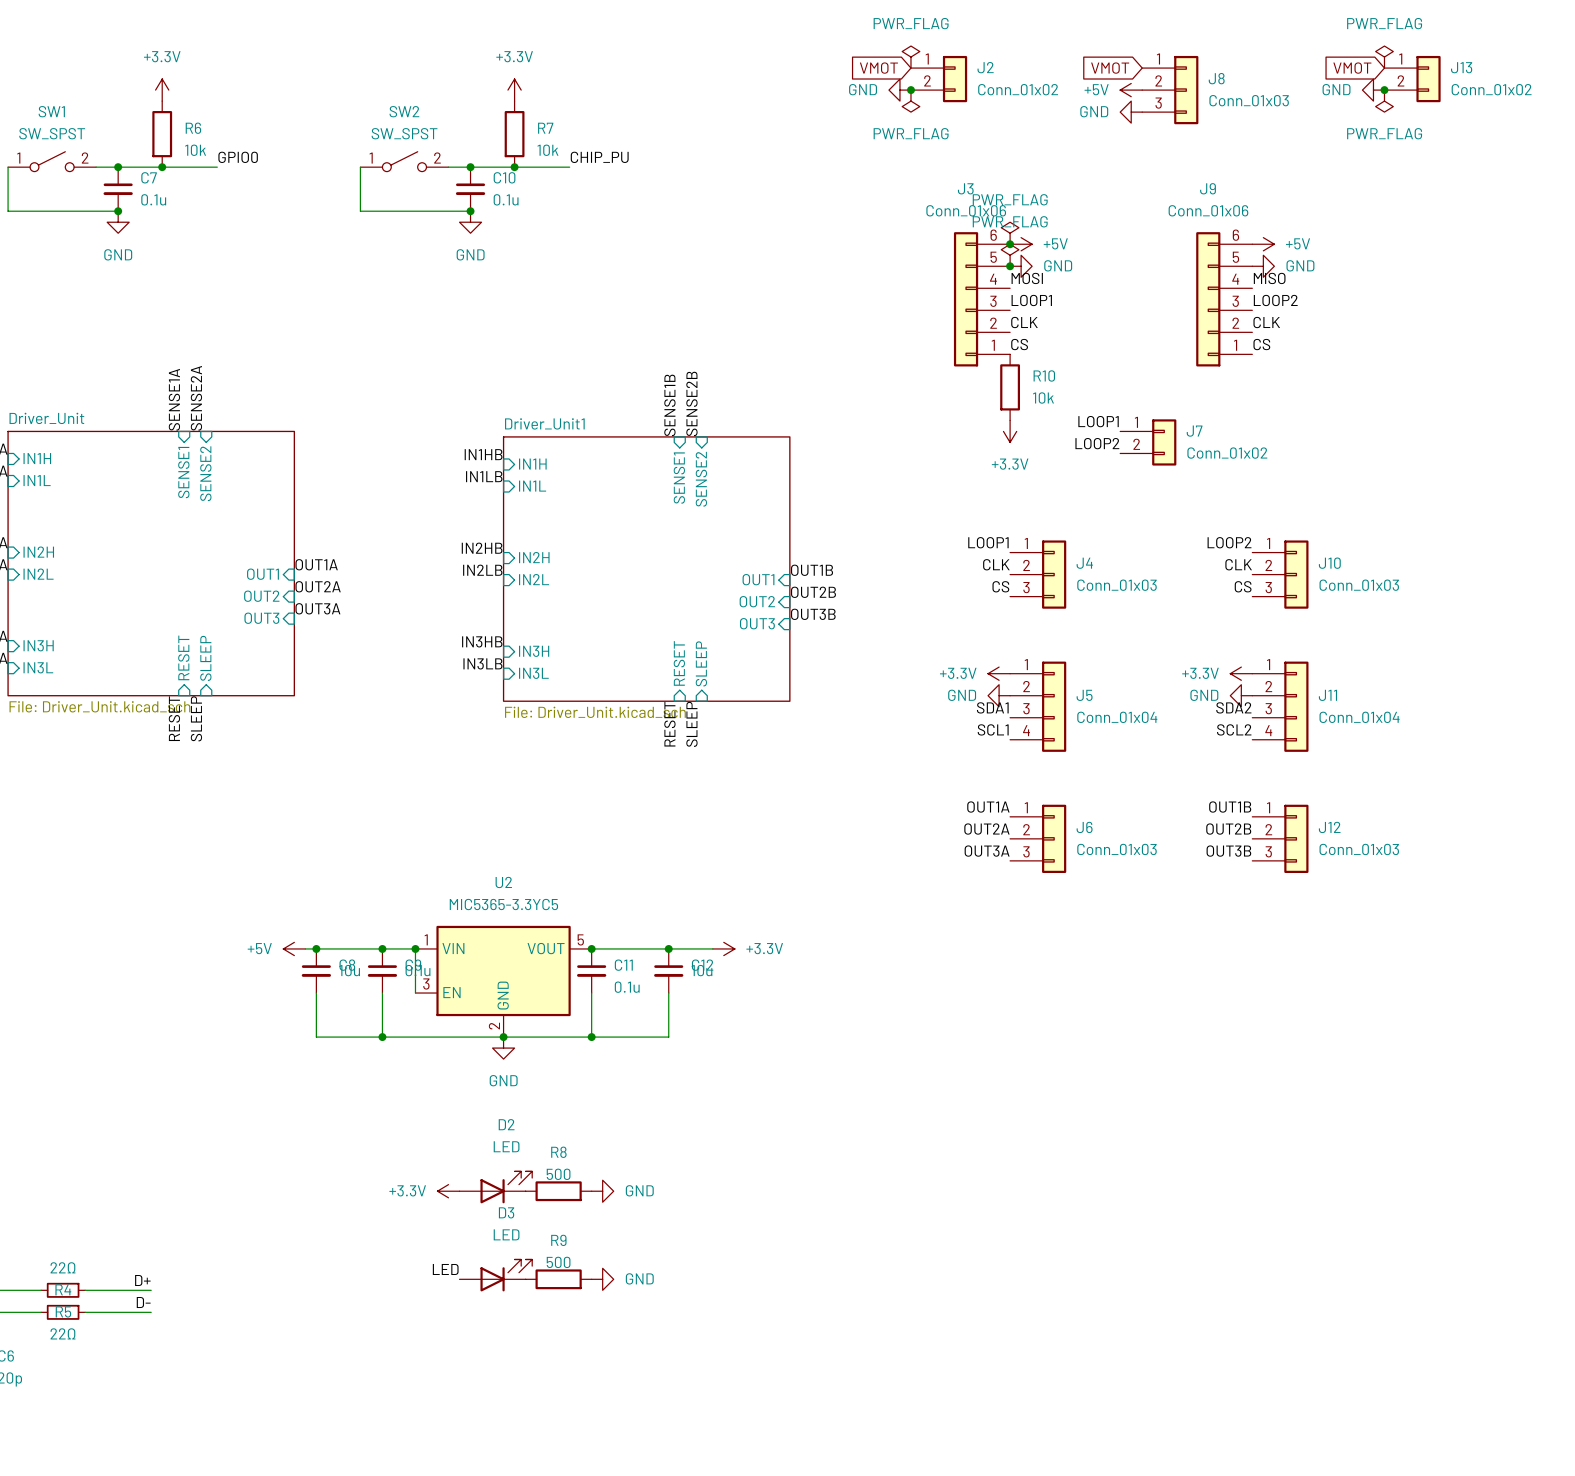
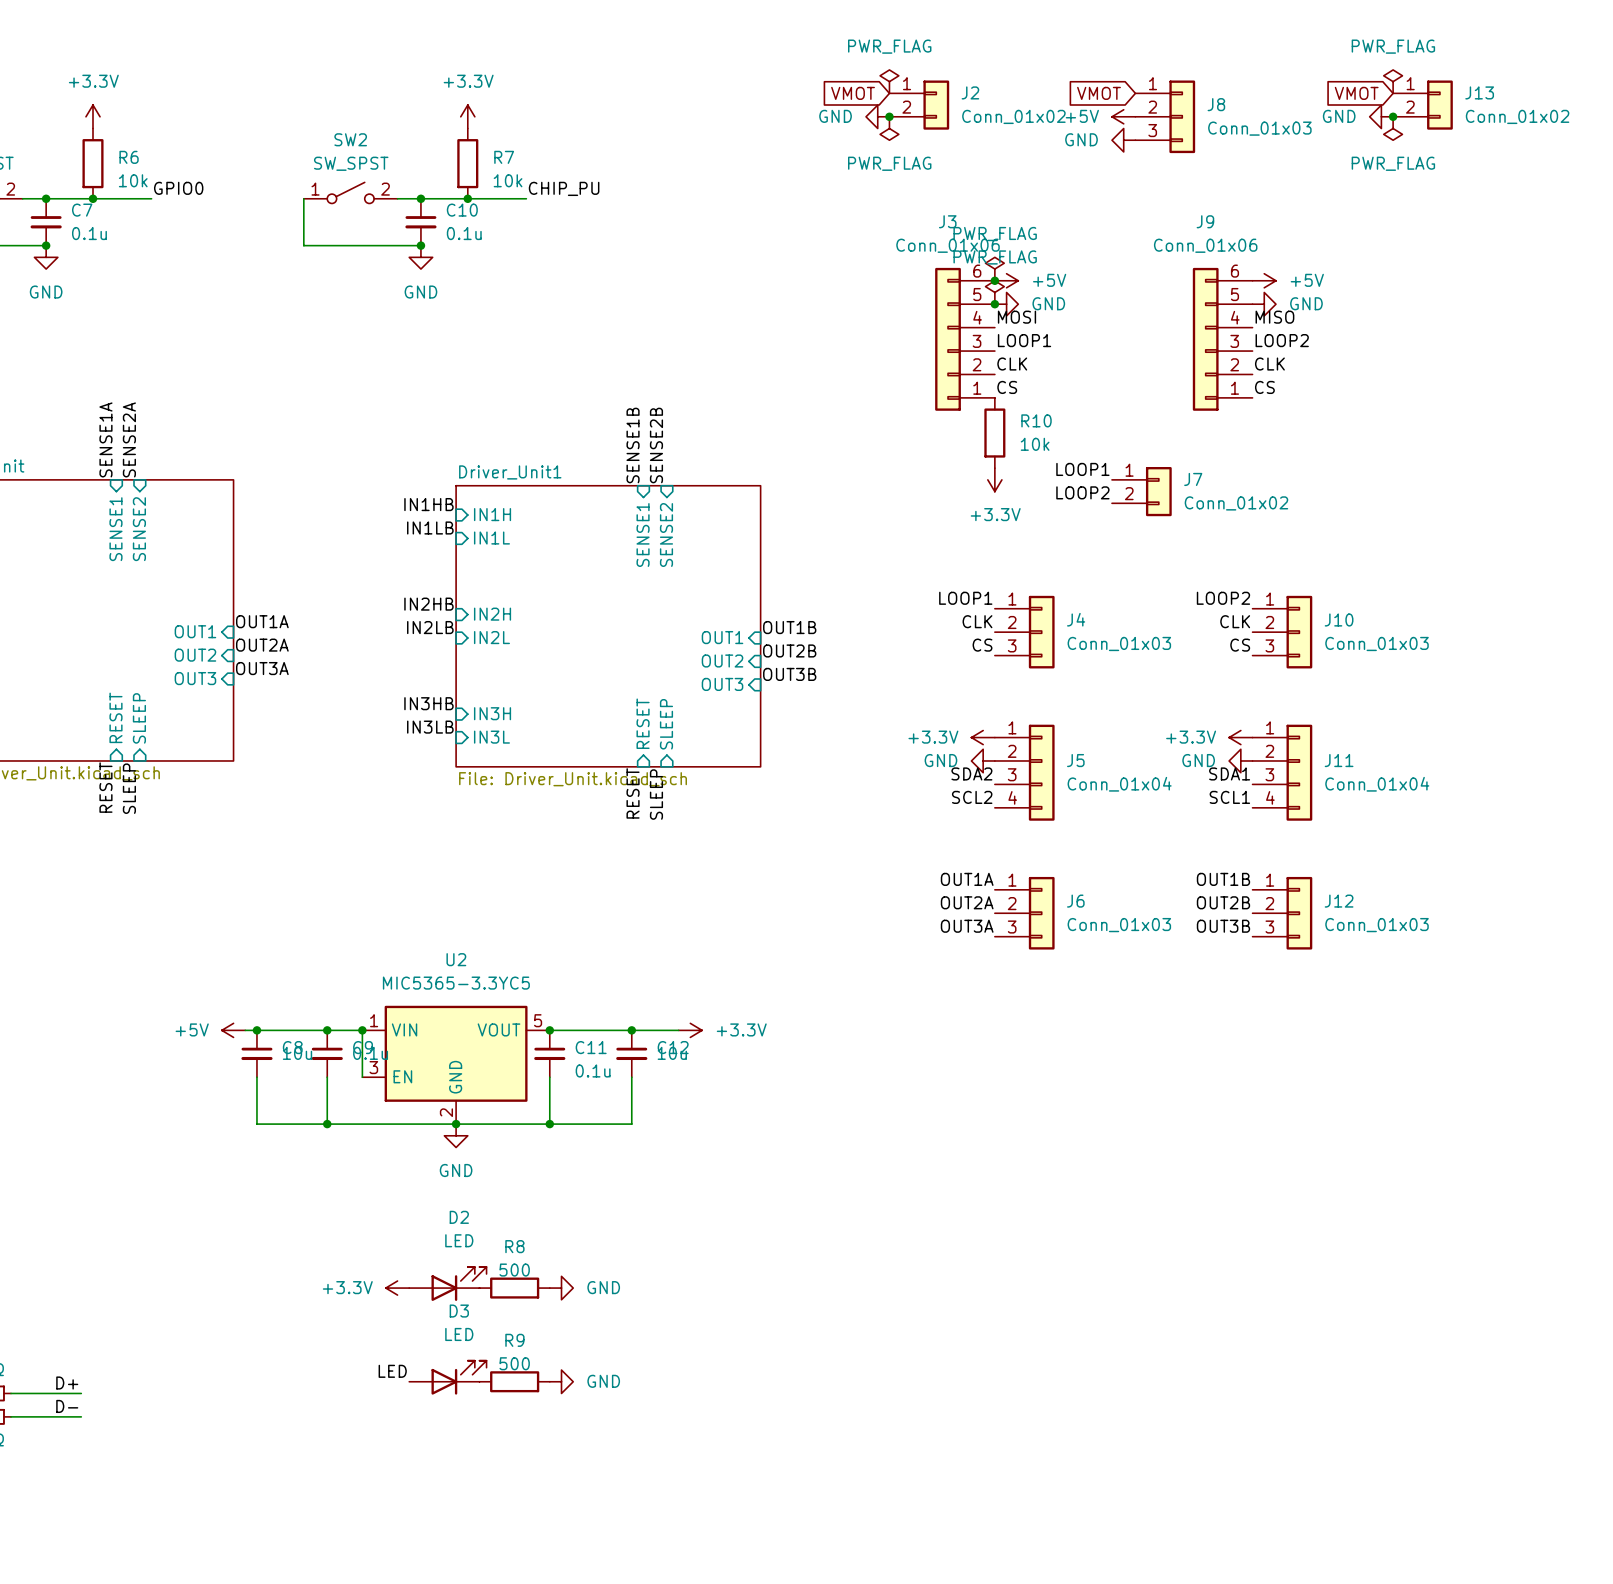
label: SDA1 (992, 707) -> SDA2 (971, 773)
label: SDA2 (1233, 707) -> SDA1 (1229, 773)
label: SCL1 (993, 729) -> SCL2 (972, 797)
label: SCL2 (1234, 729) -> SCL1 (1229, 797)

